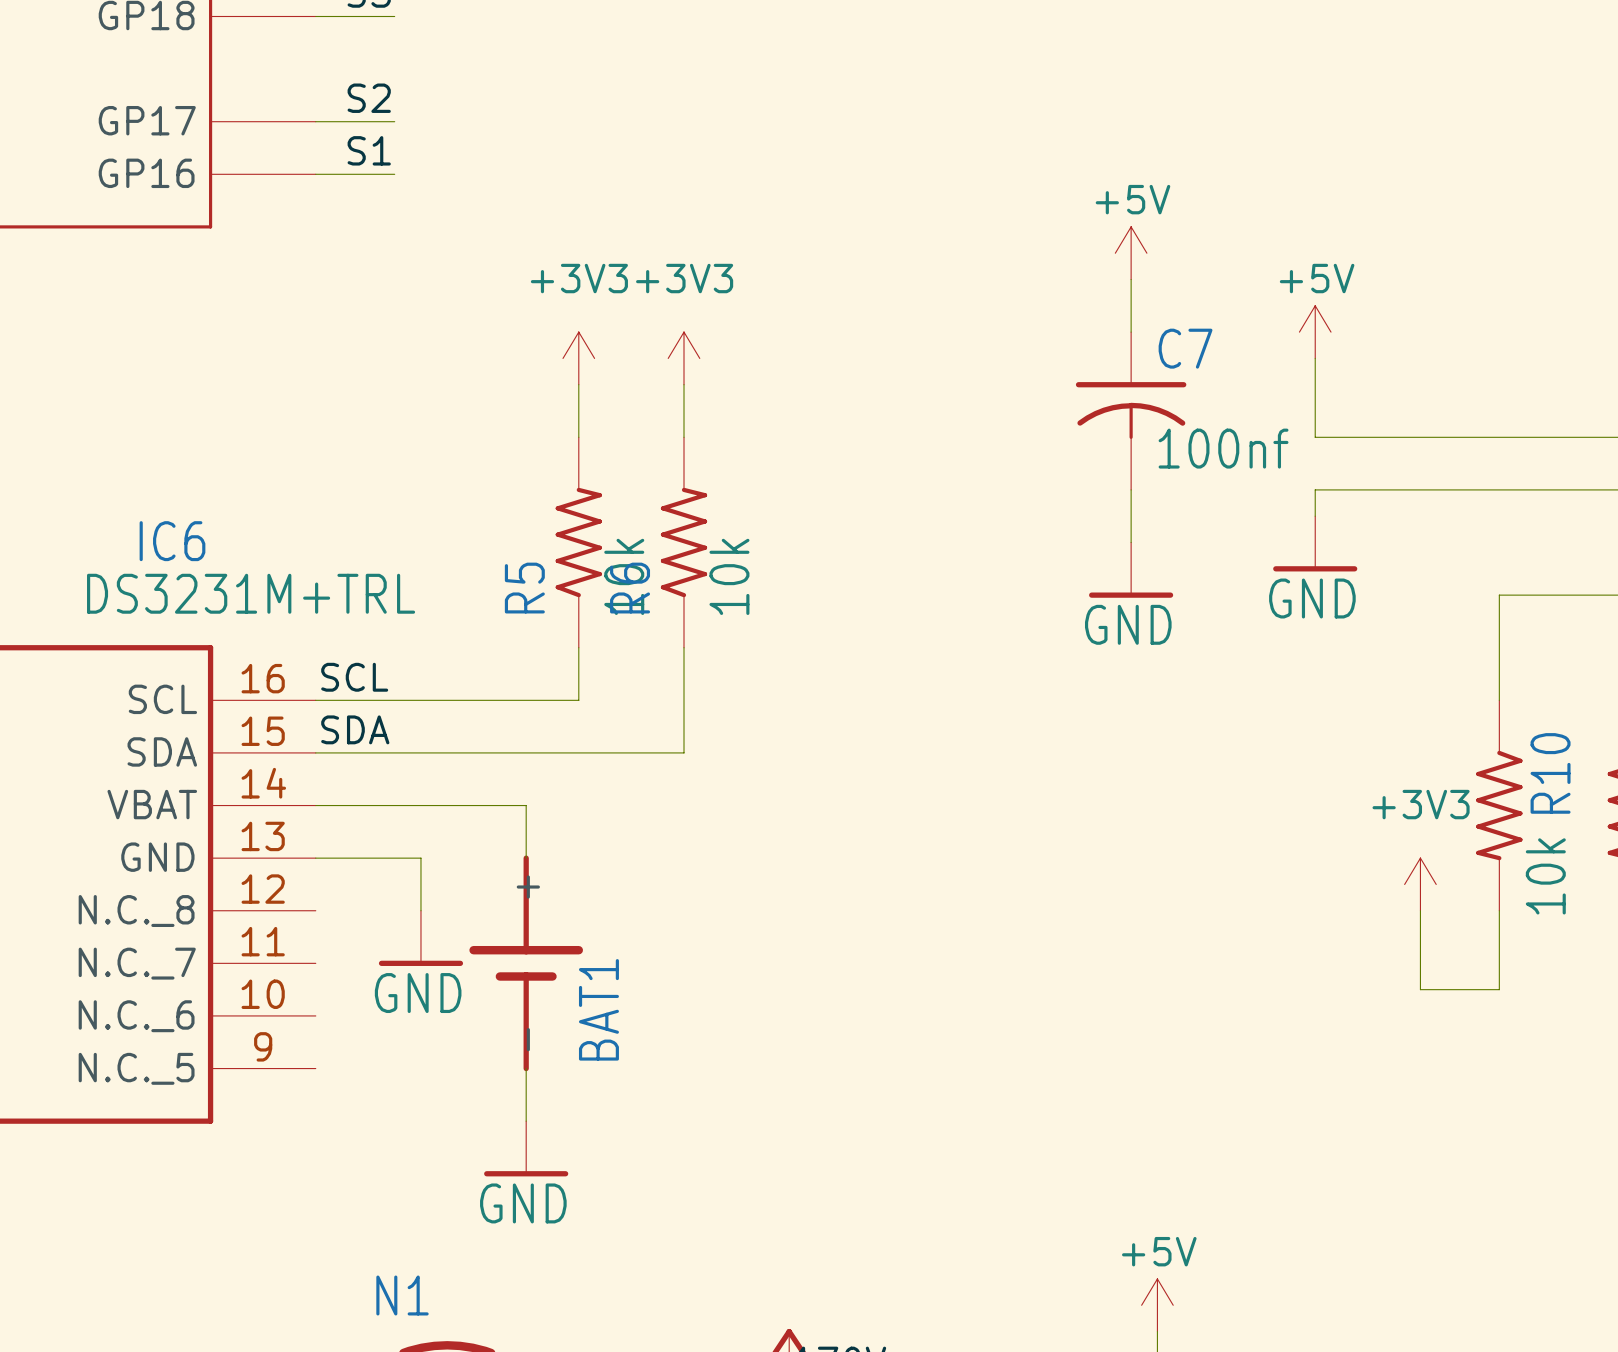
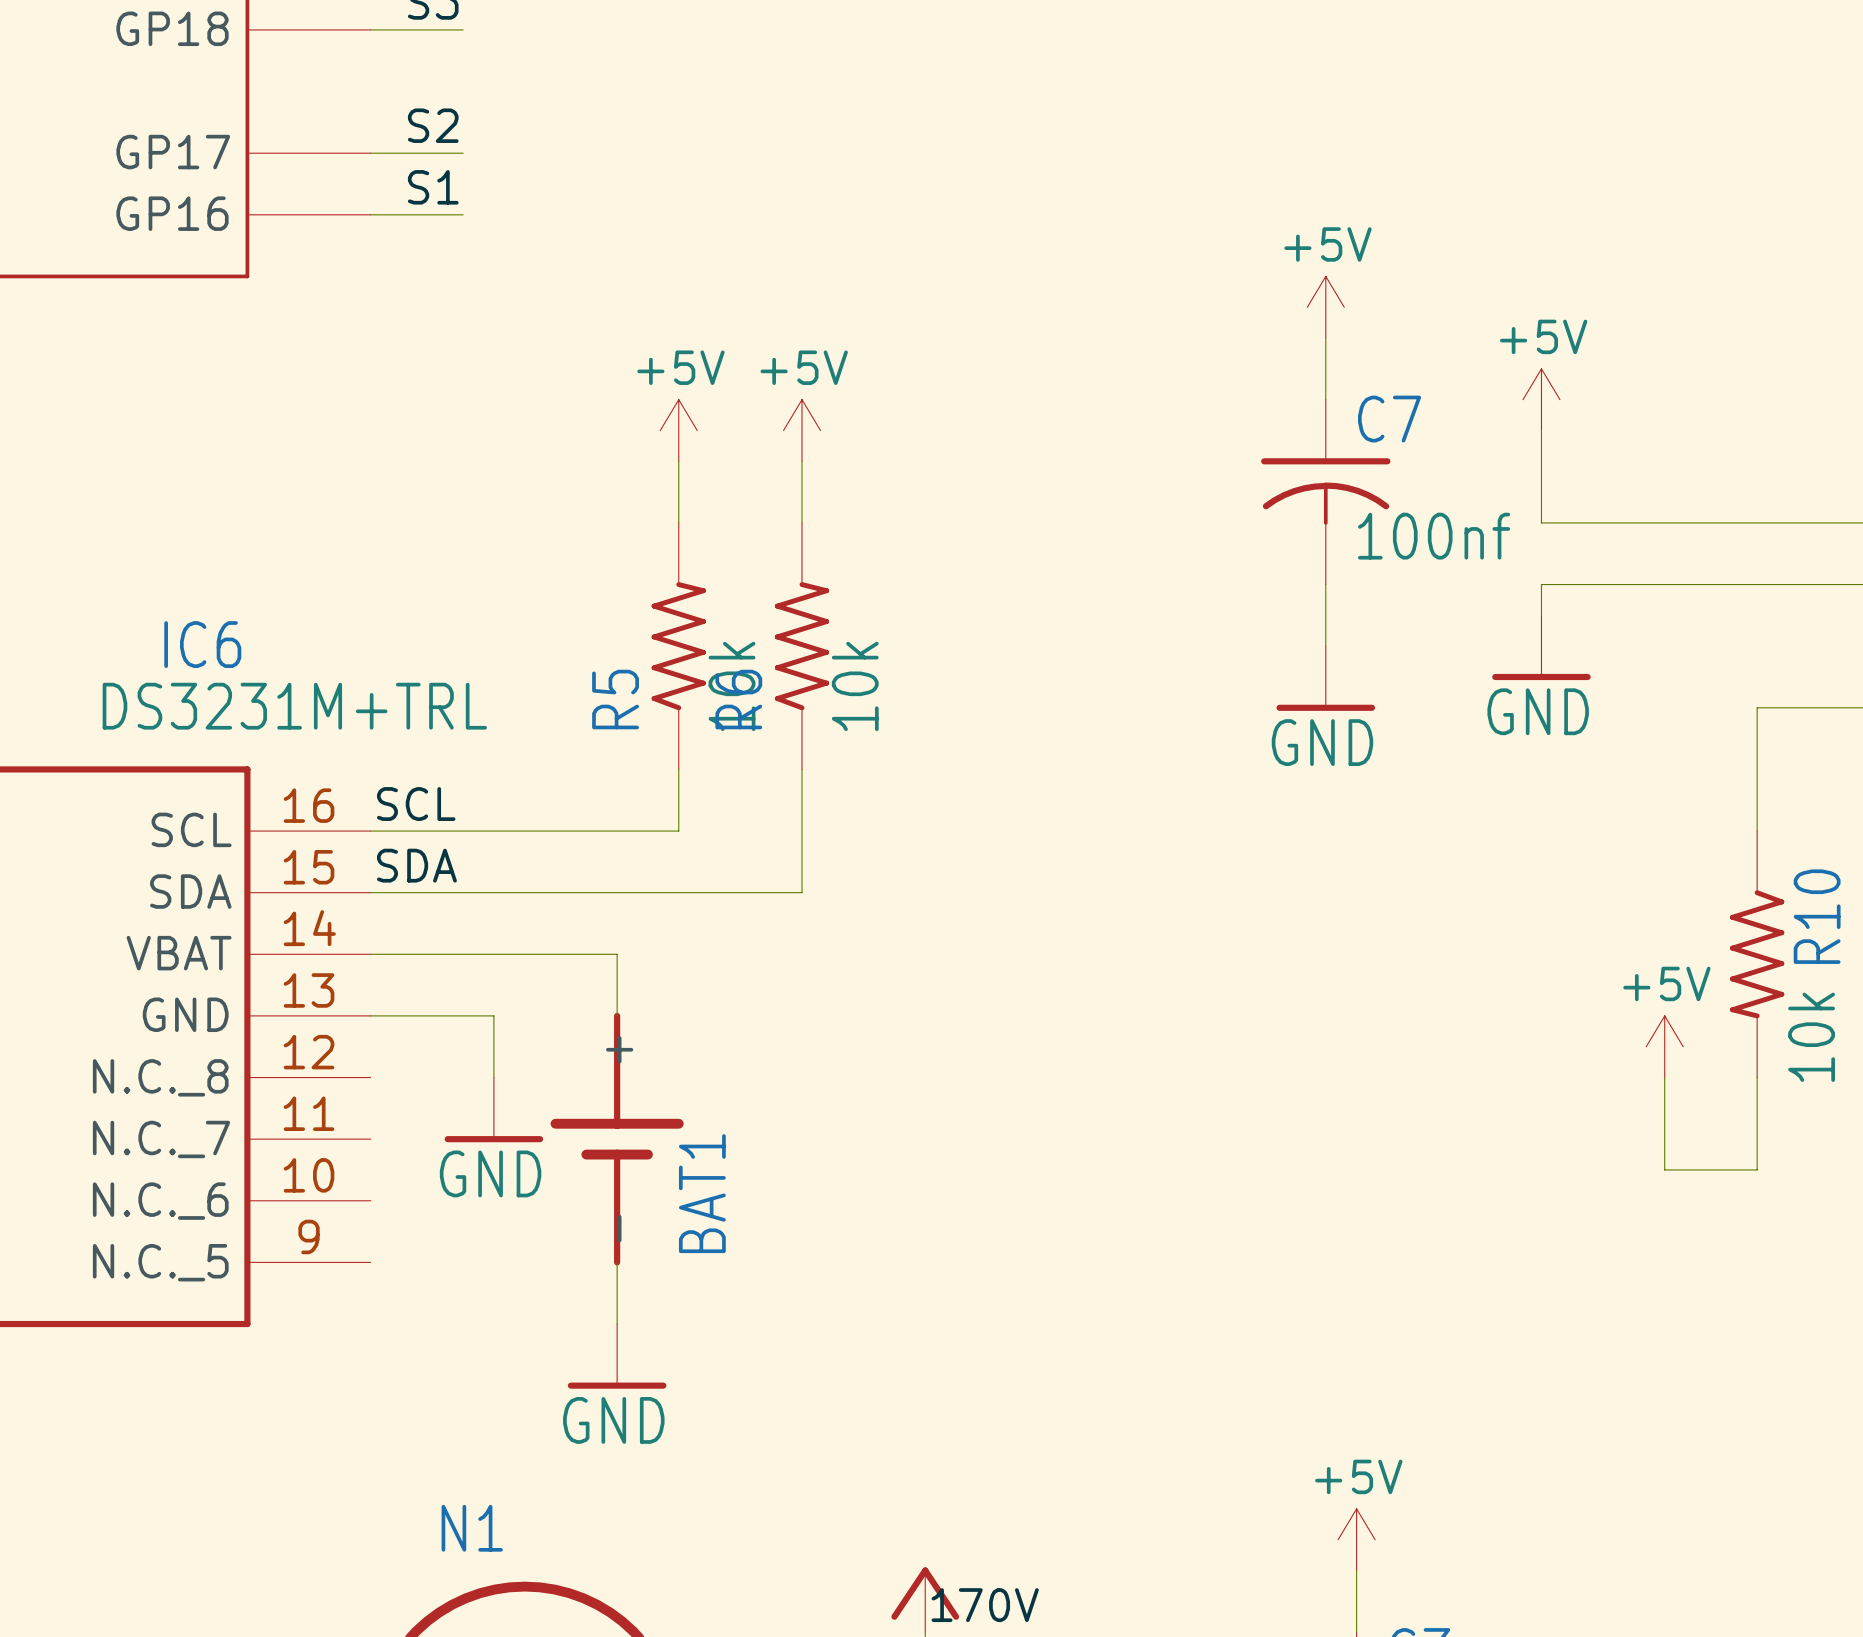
power symbol: +3V3 (578, 358) -> +5V (678, 430)
power symbol: +3V3 (684, 358) -> +5V (802, 430)
power symbol: +3V3 (1420, 884) -> +5V (1664, 1046)

